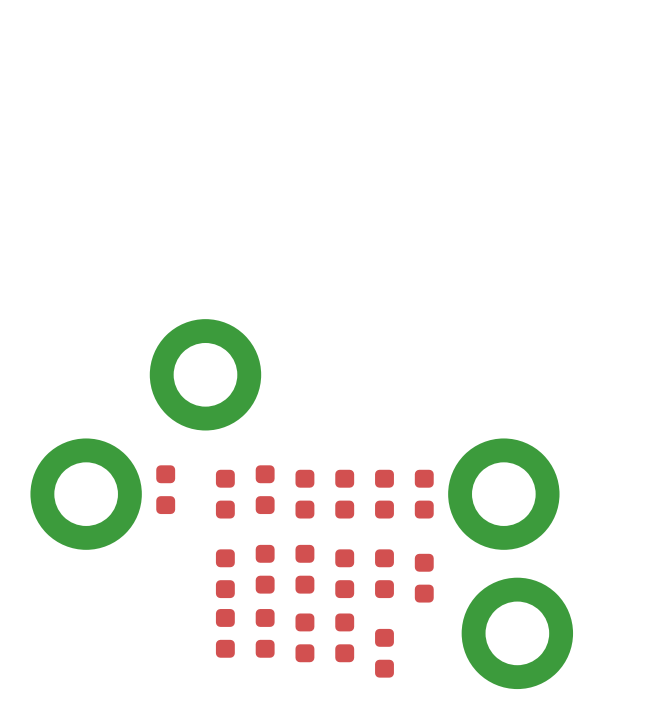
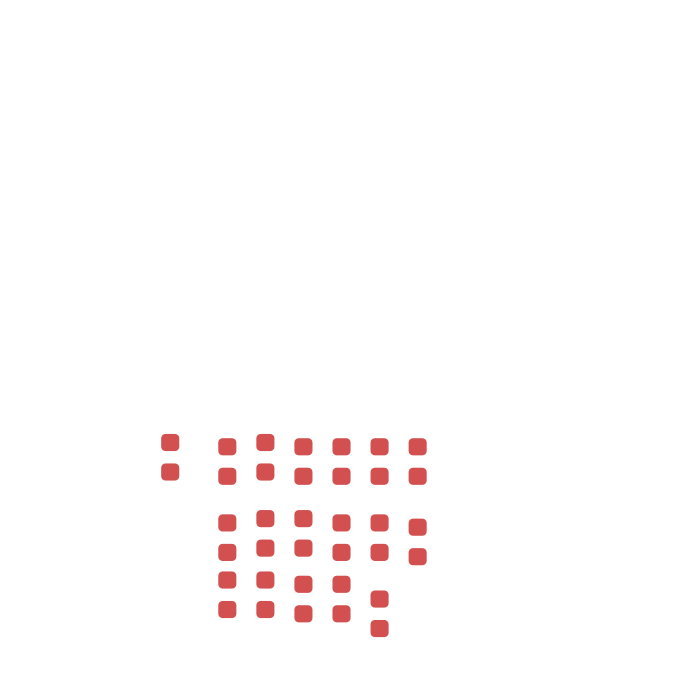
part: (205, 374) -> none
part: (86, 494) -> none
part: (503, 494) -> none
part: (517, 633) -> none

